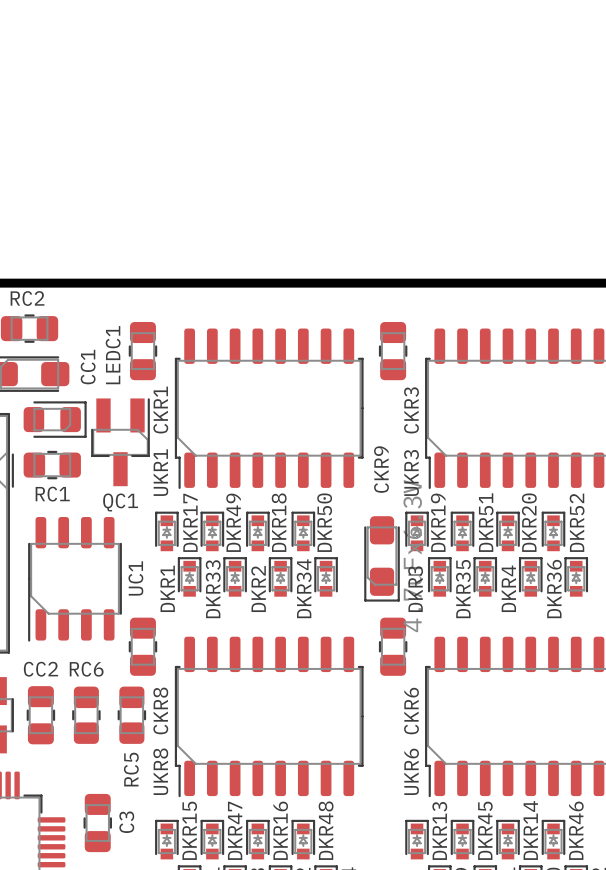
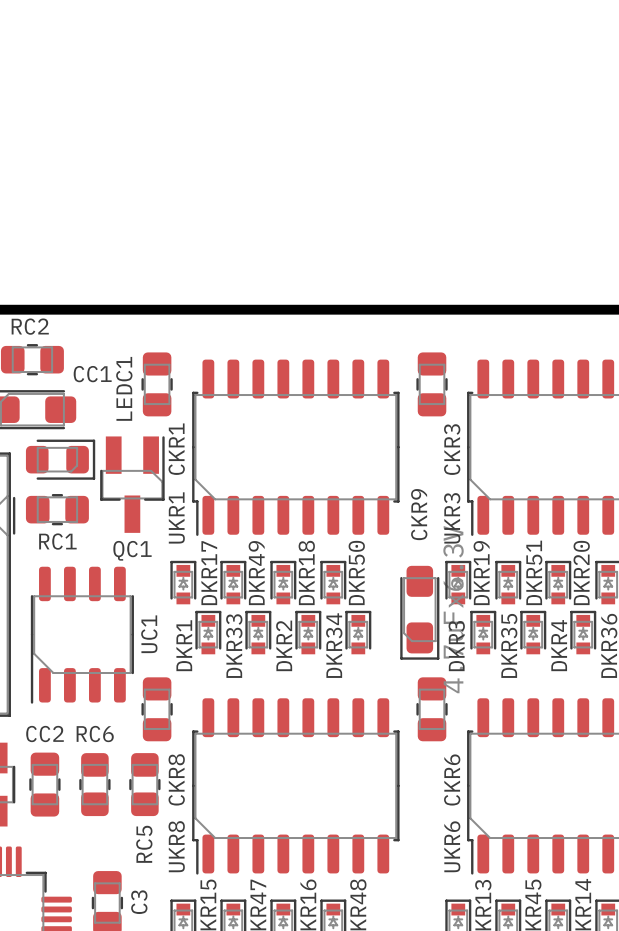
CC1 name rotation: 0° (88, 367) -> 90° clockwise (92, 374)

